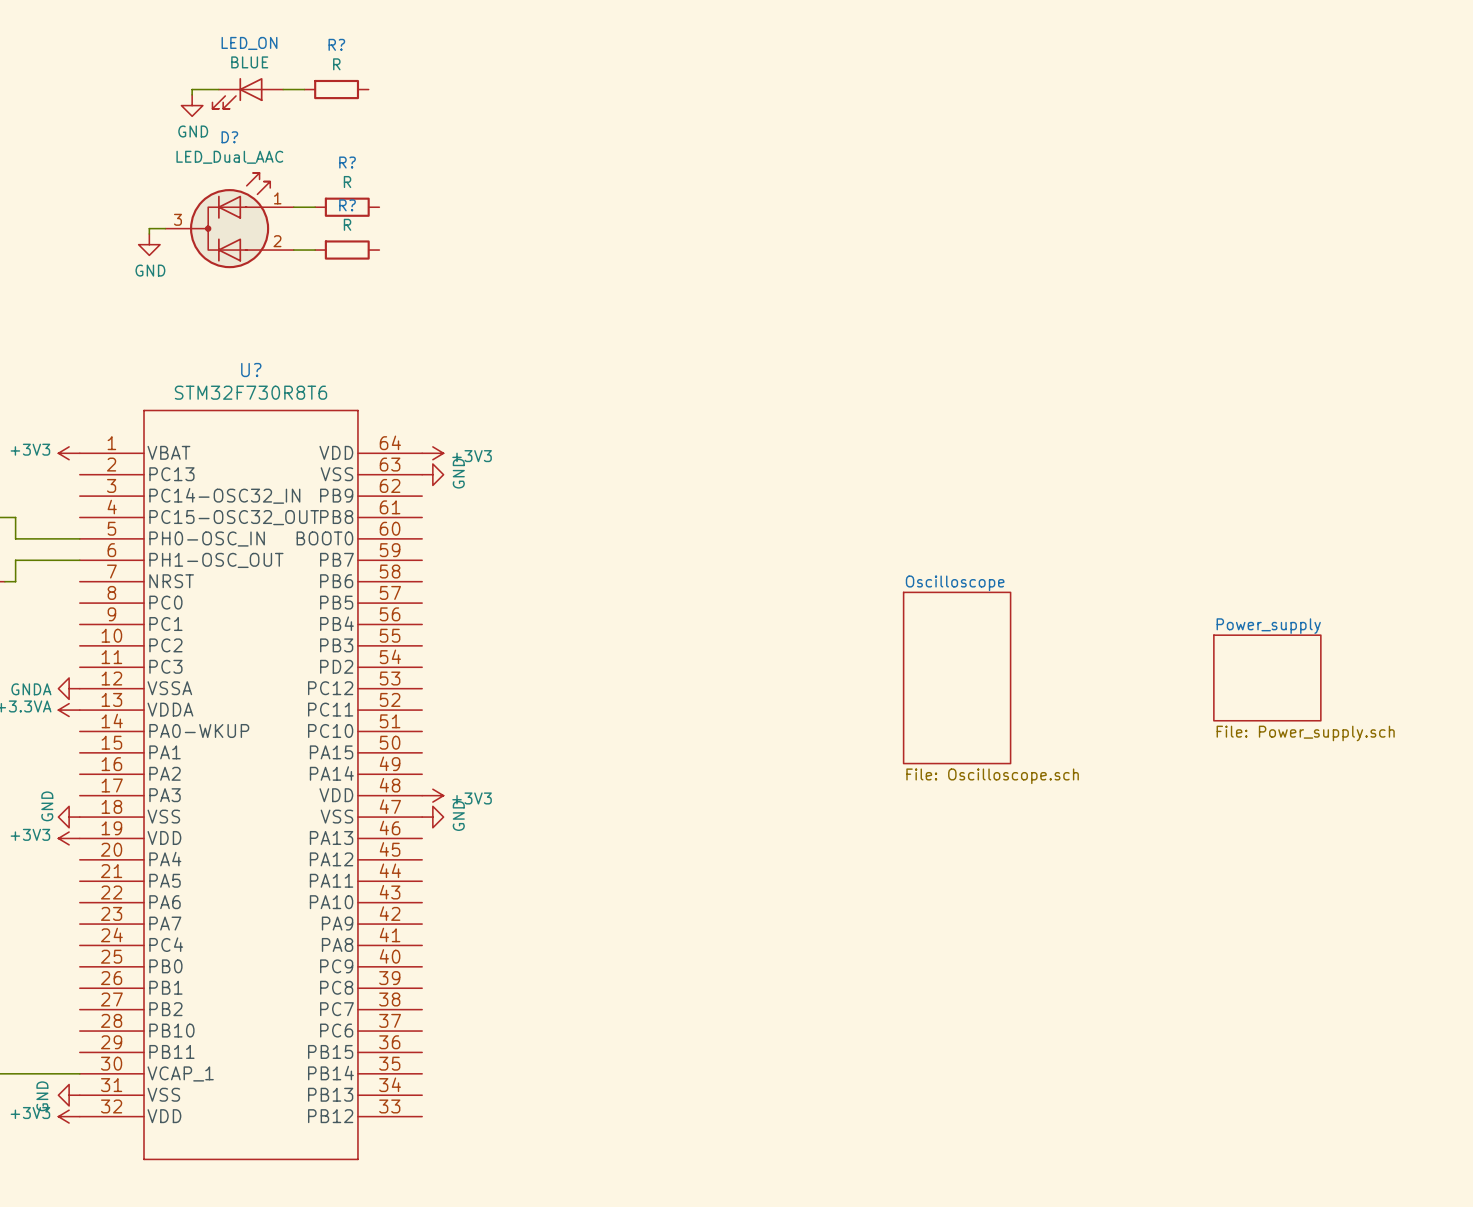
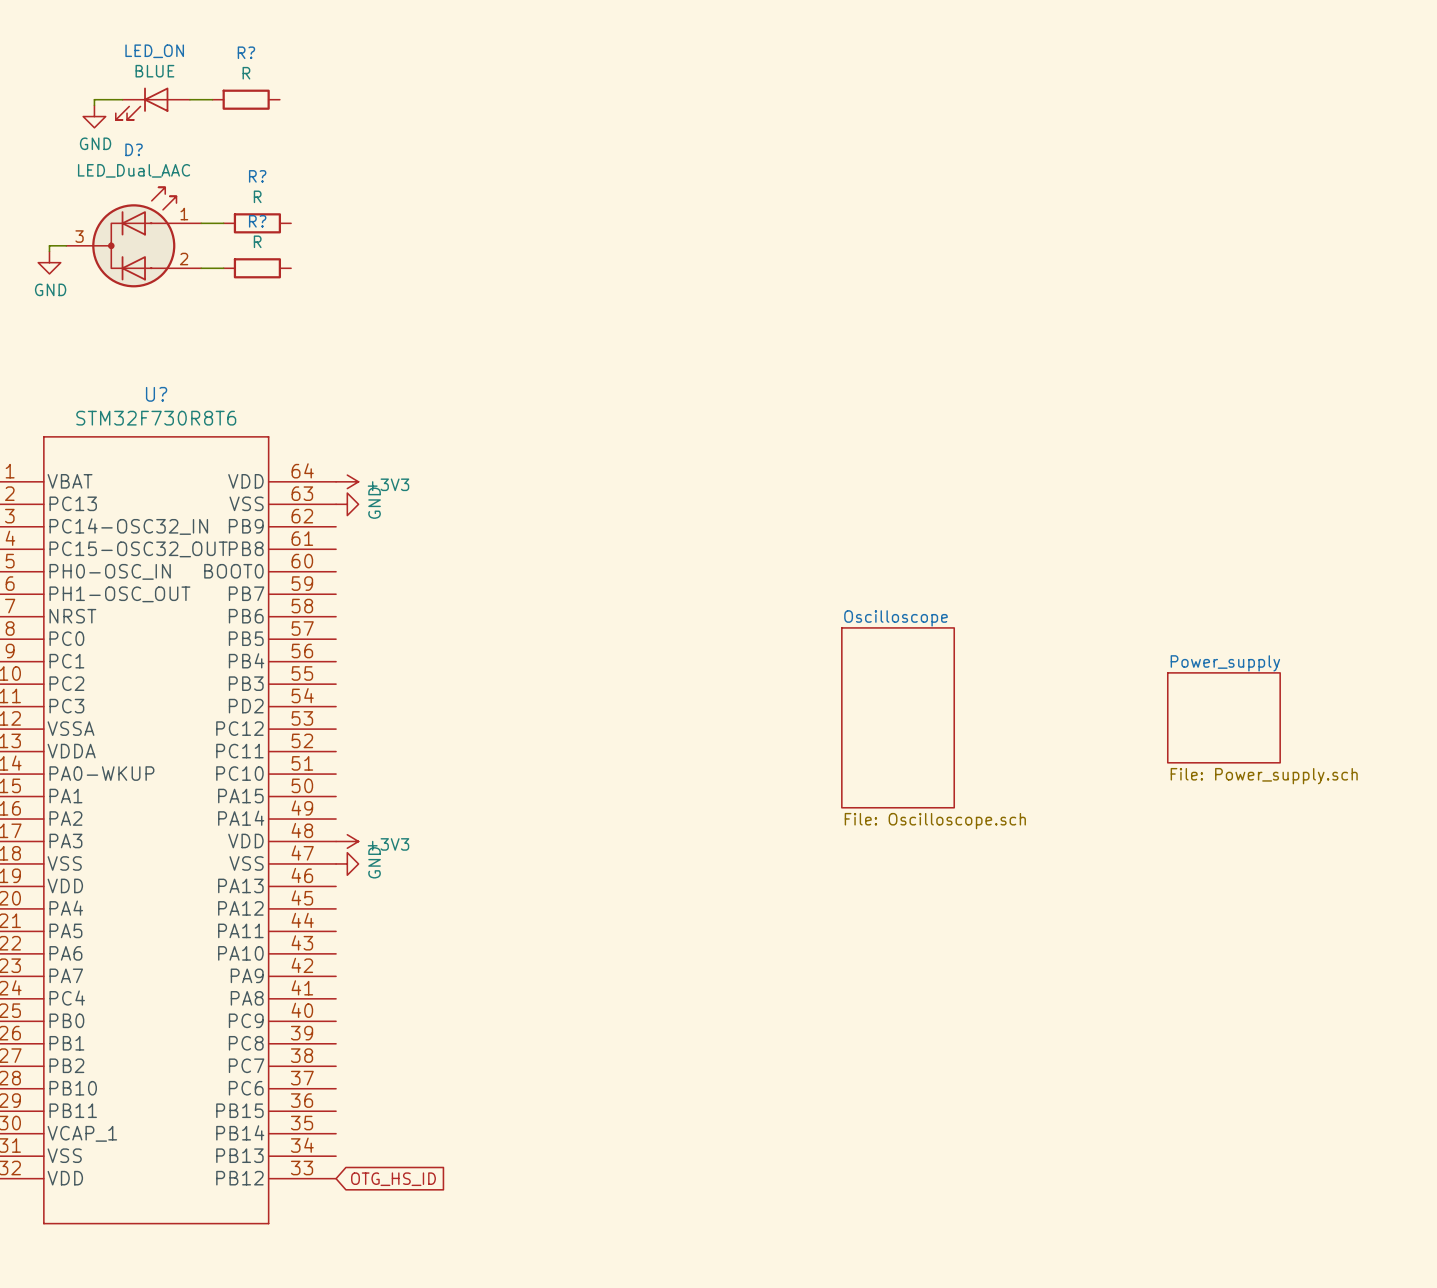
global label: none -> OTG_HS_ID (393, 1179)

